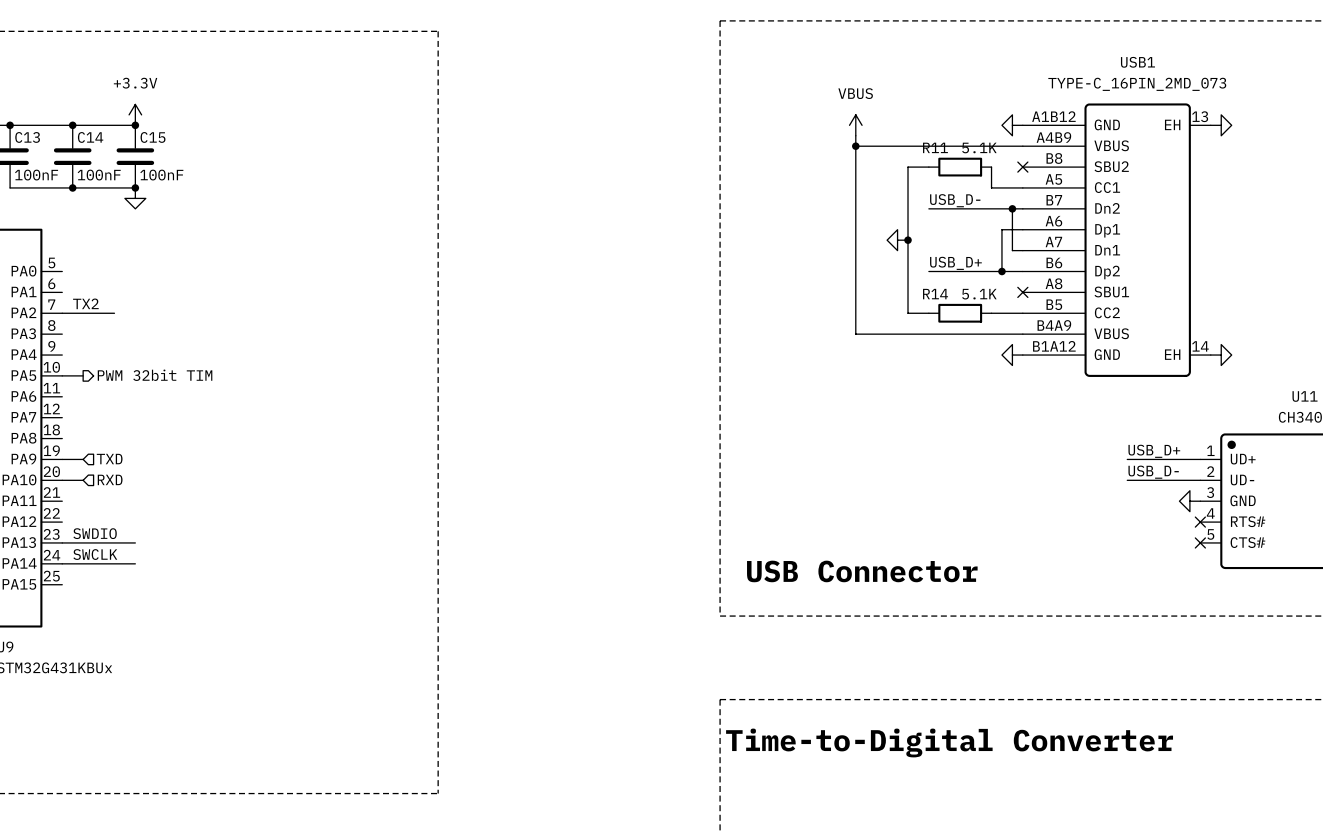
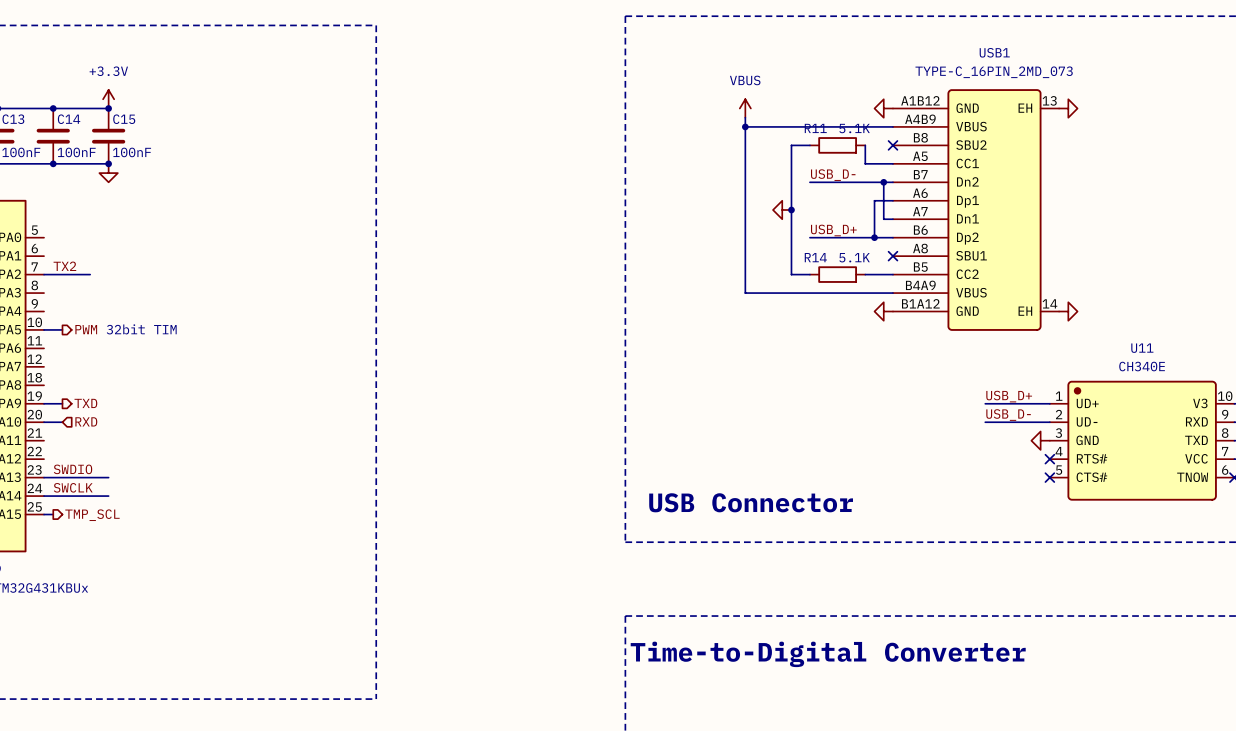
hierarchical label shape: input (109, 459) -> output (85, 403)
wire: none -> (44, 514) (53, 514)
hierarchical label: none -> TMP_SCL (92, 515)

